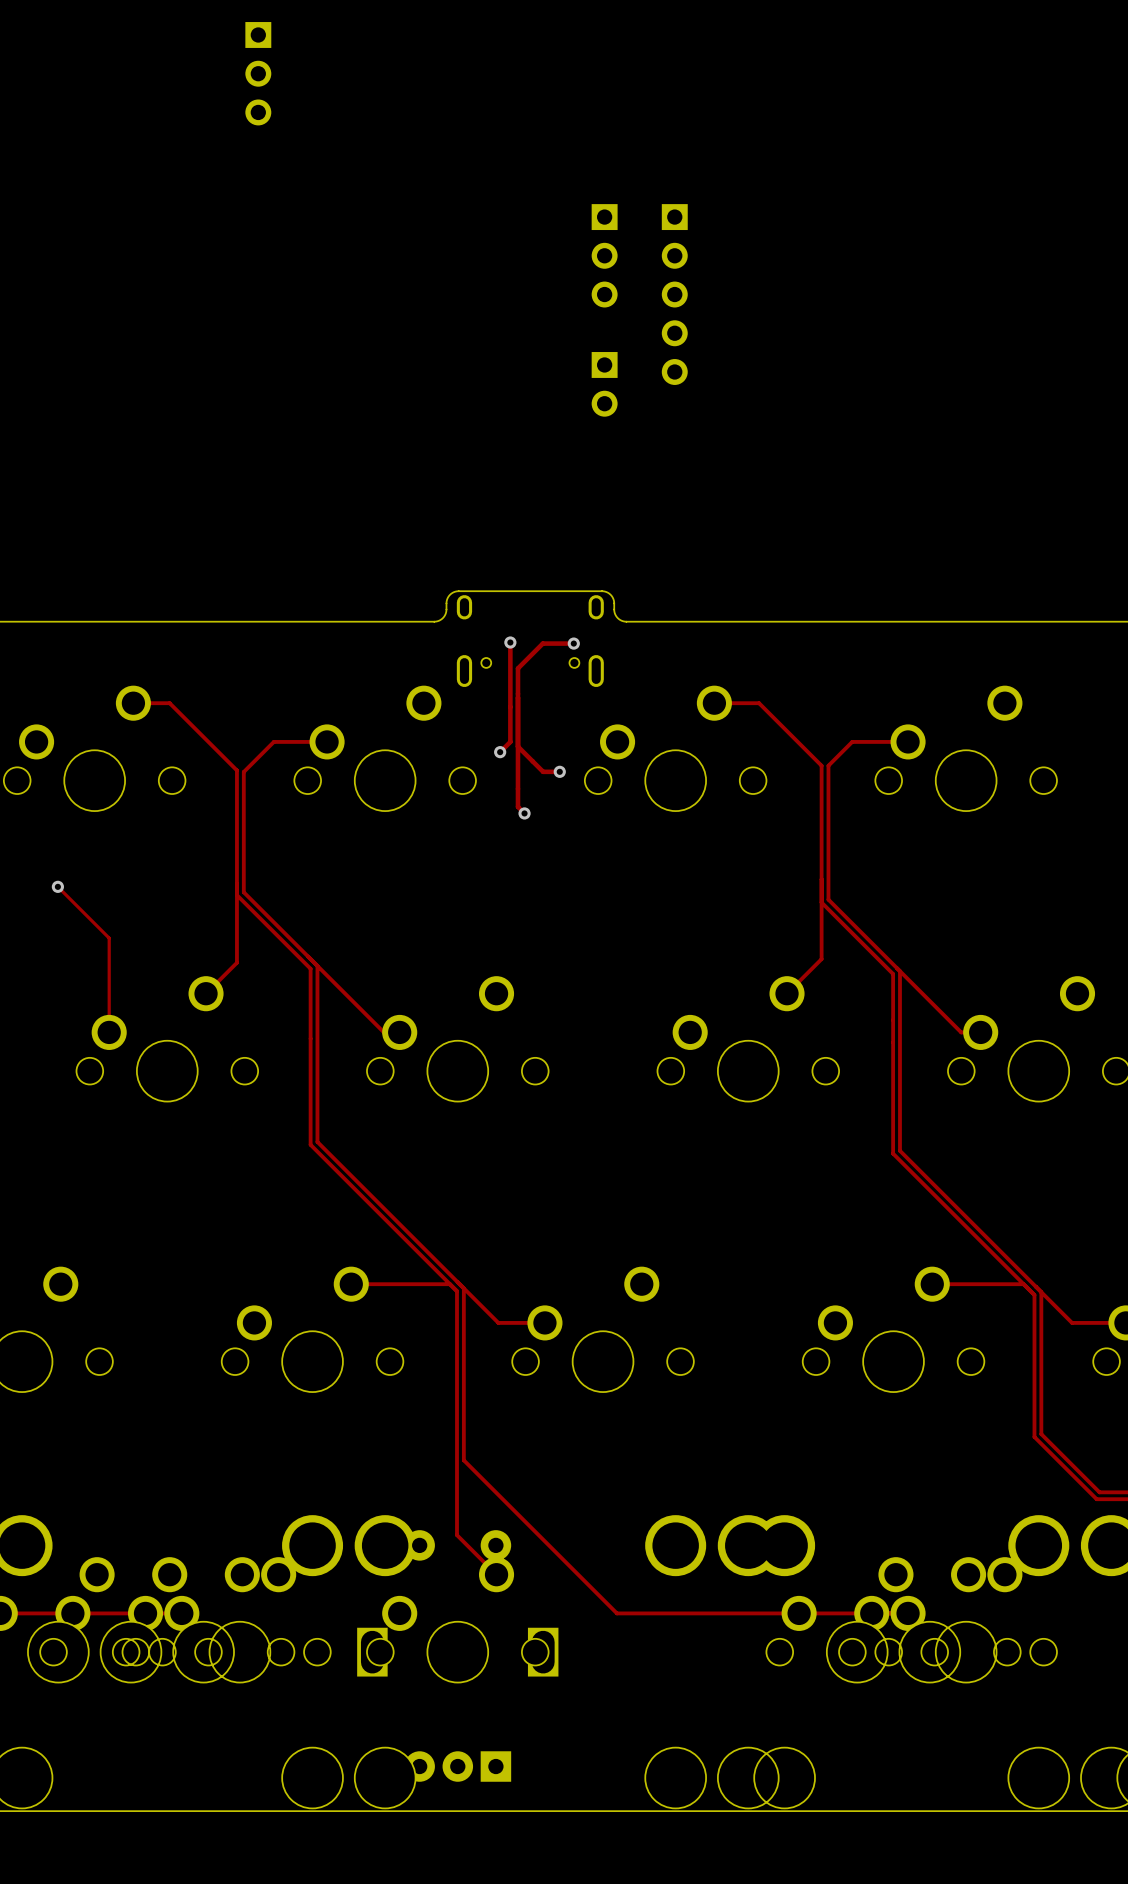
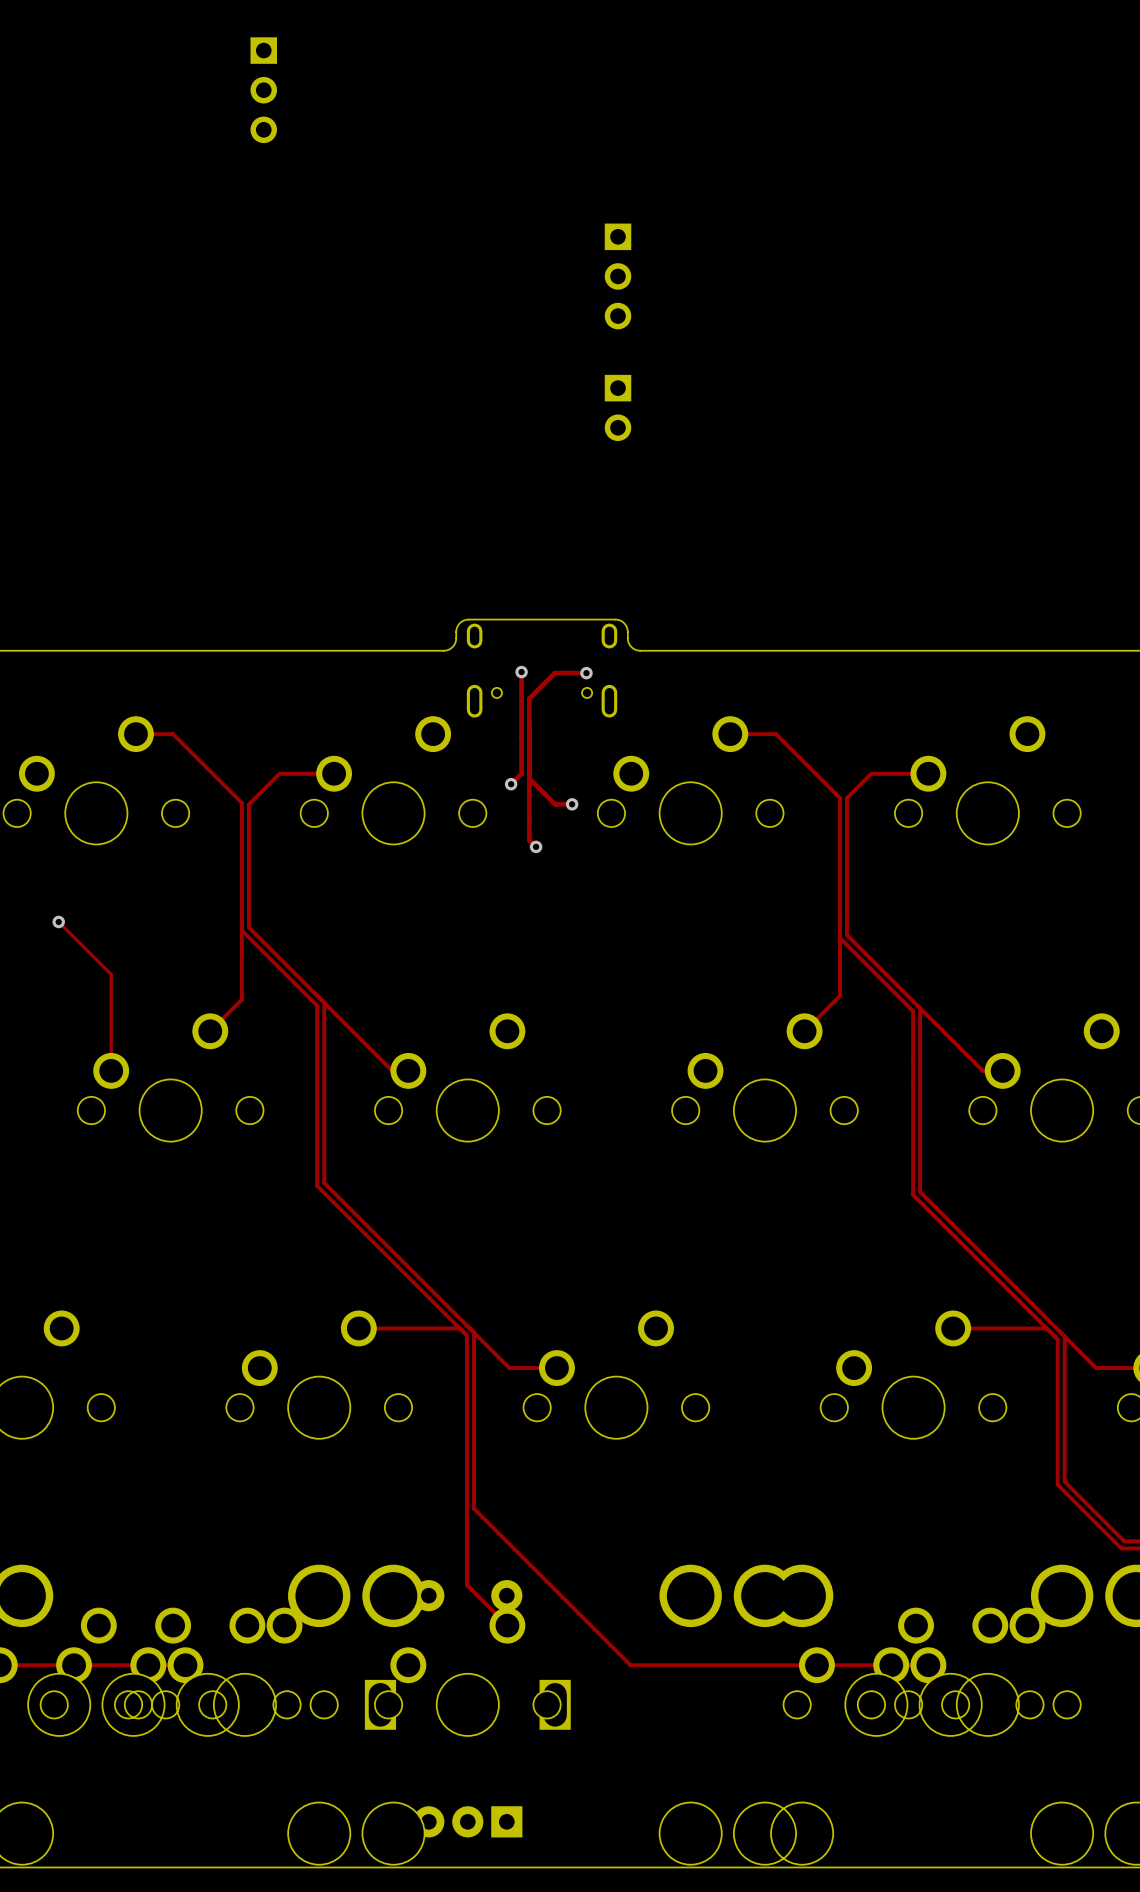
part: (674, 294) -> none

